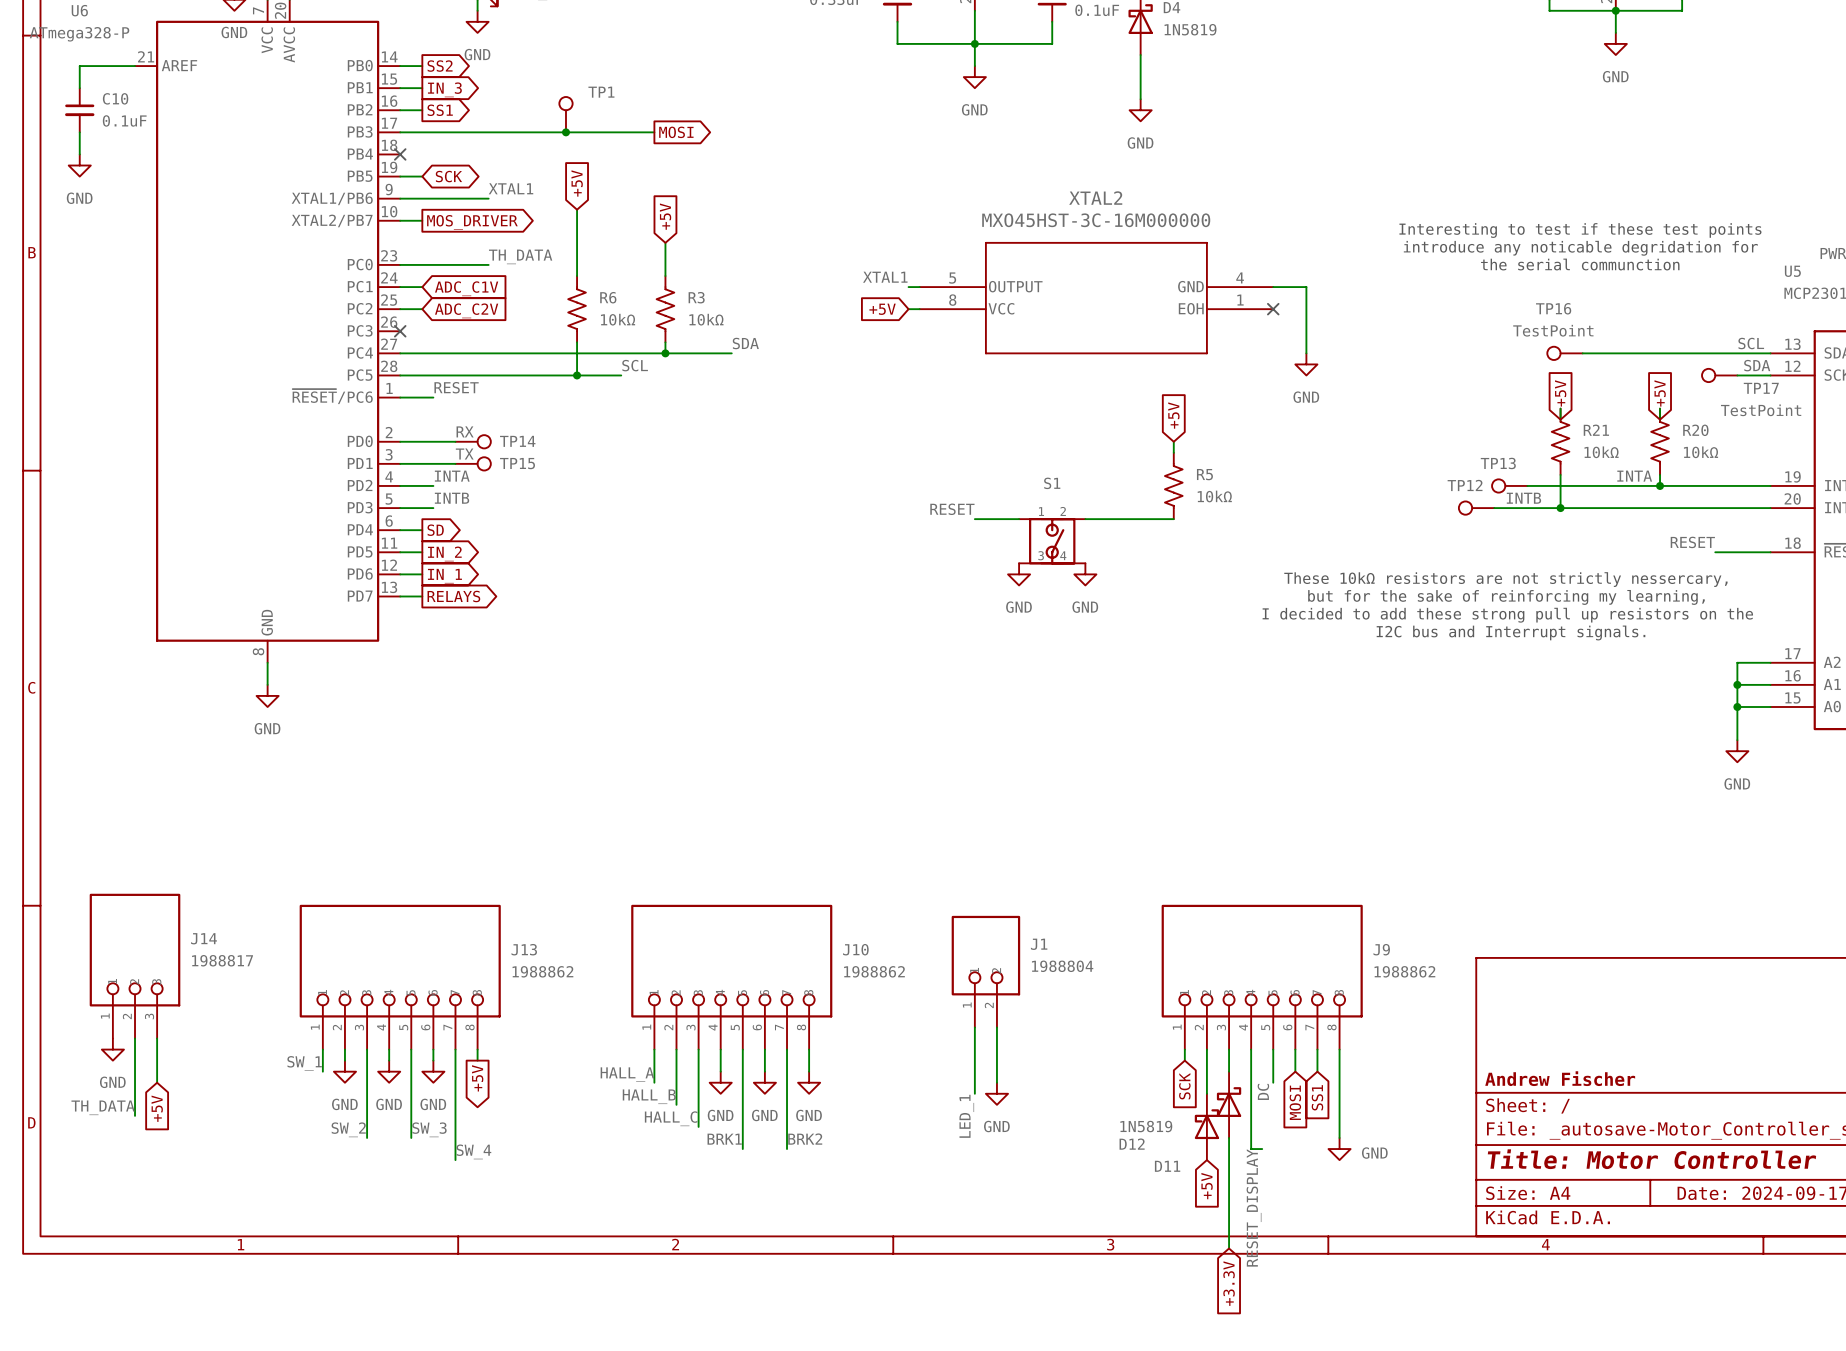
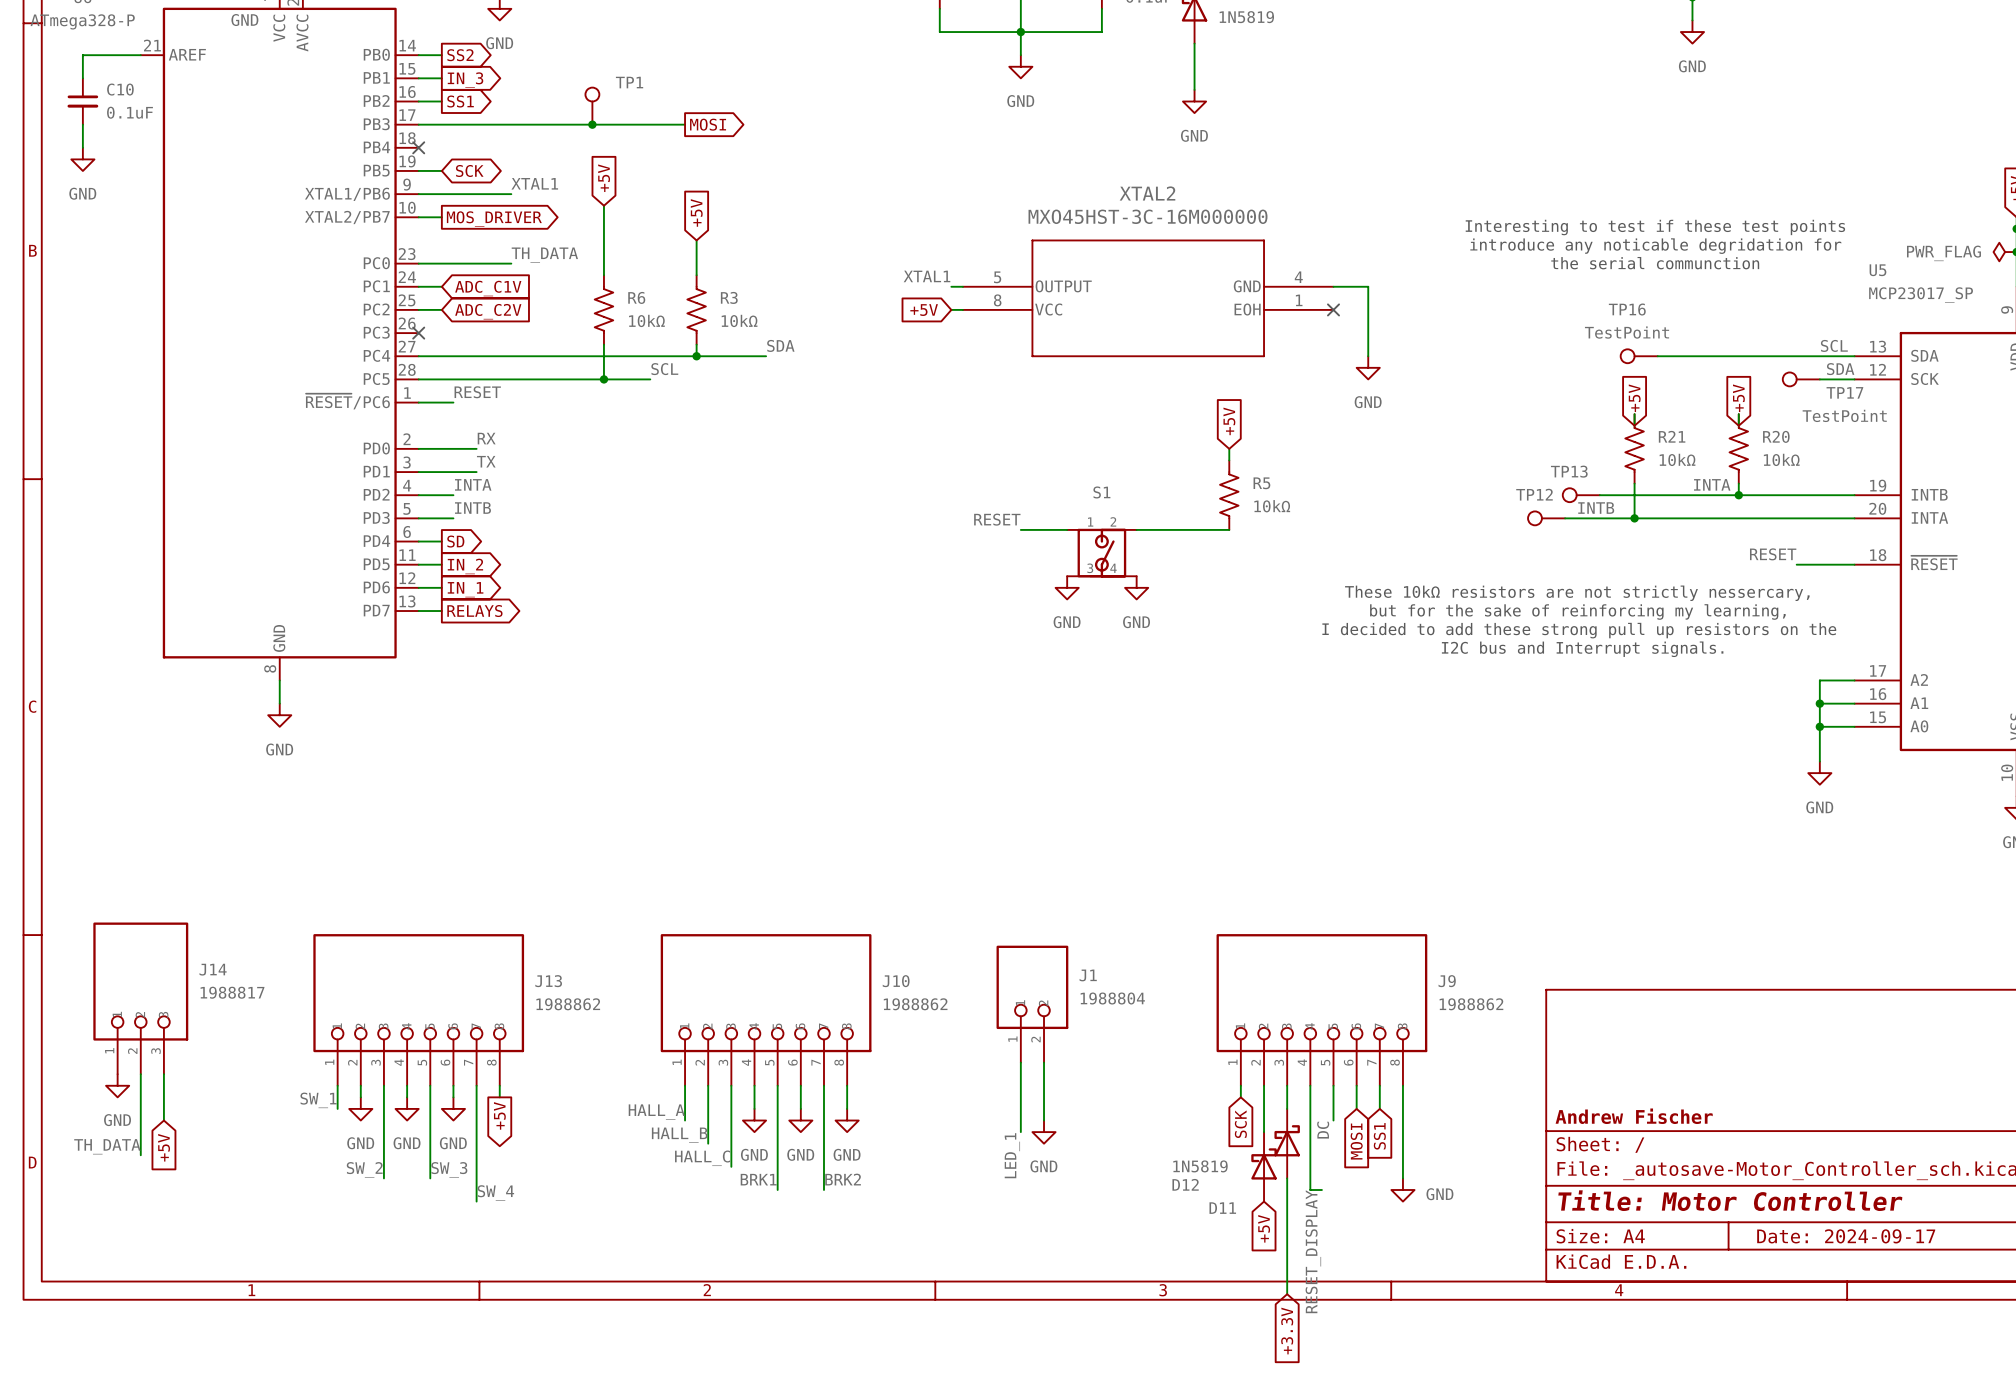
TP14: (473, 441) -> none
TP15: (473, 463) -> none

